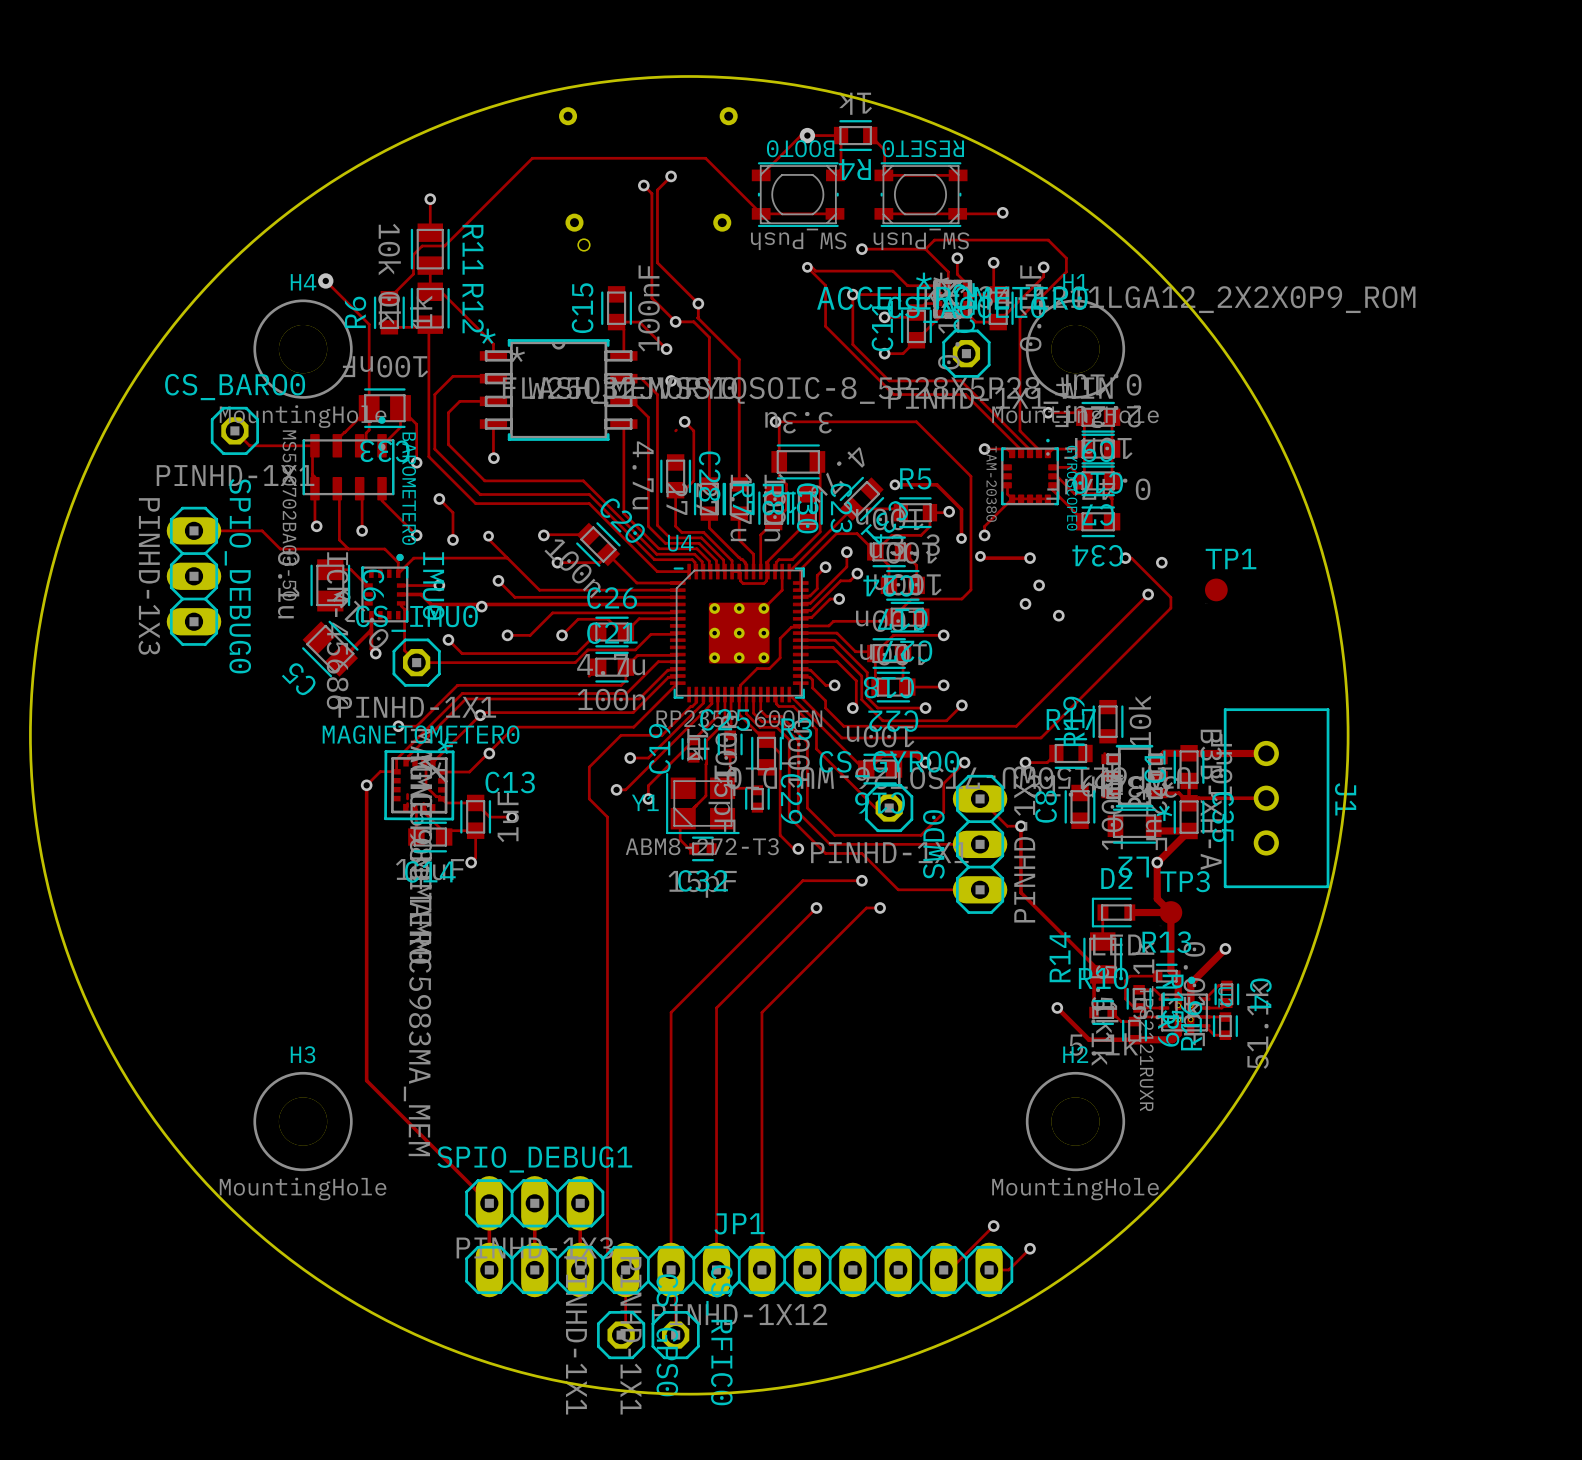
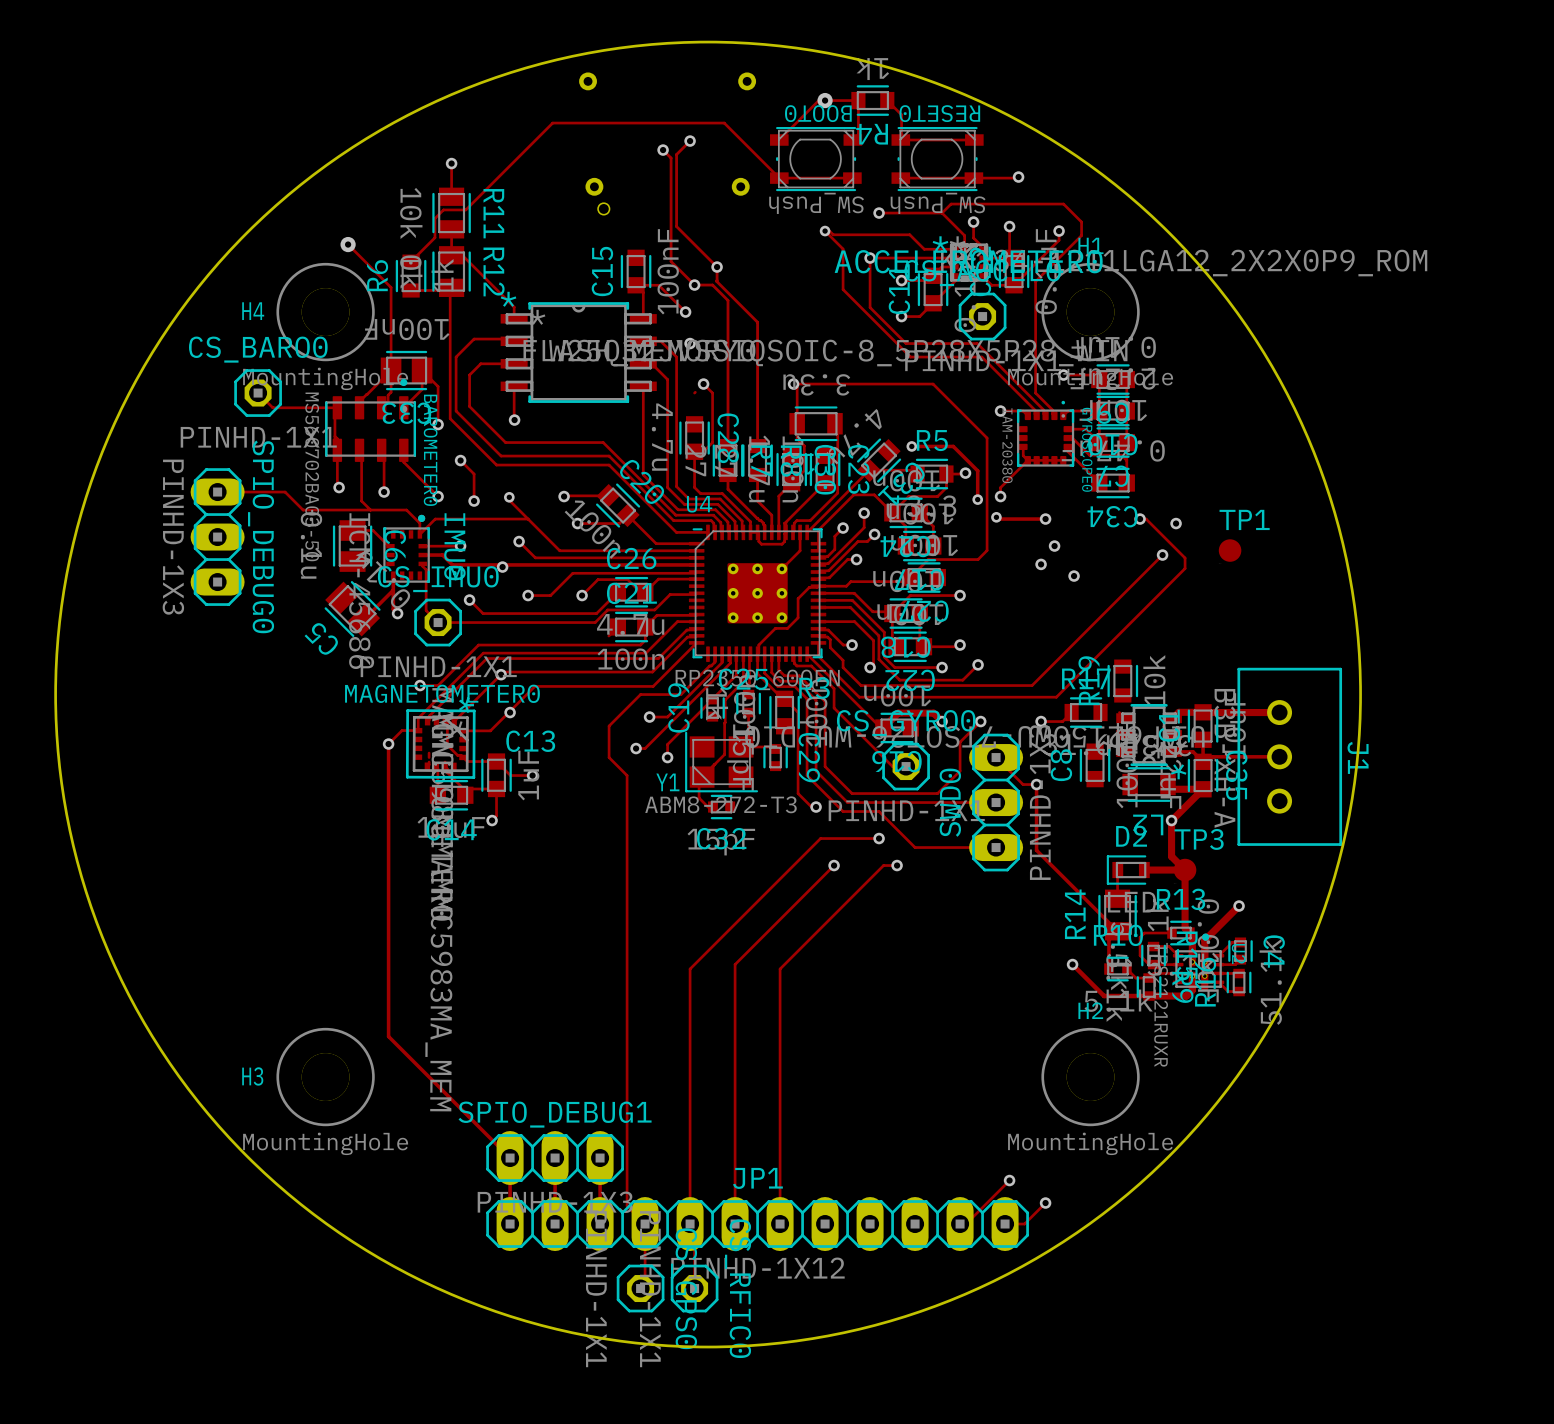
H4 name position: H4 (303, 282) -> H4 (253, 311)
Y1 name position: Y1 (645, 802) -> Y1 (667, 782)
H3 name position: H3 (303, 1054) -> H3 (252, 1076)

